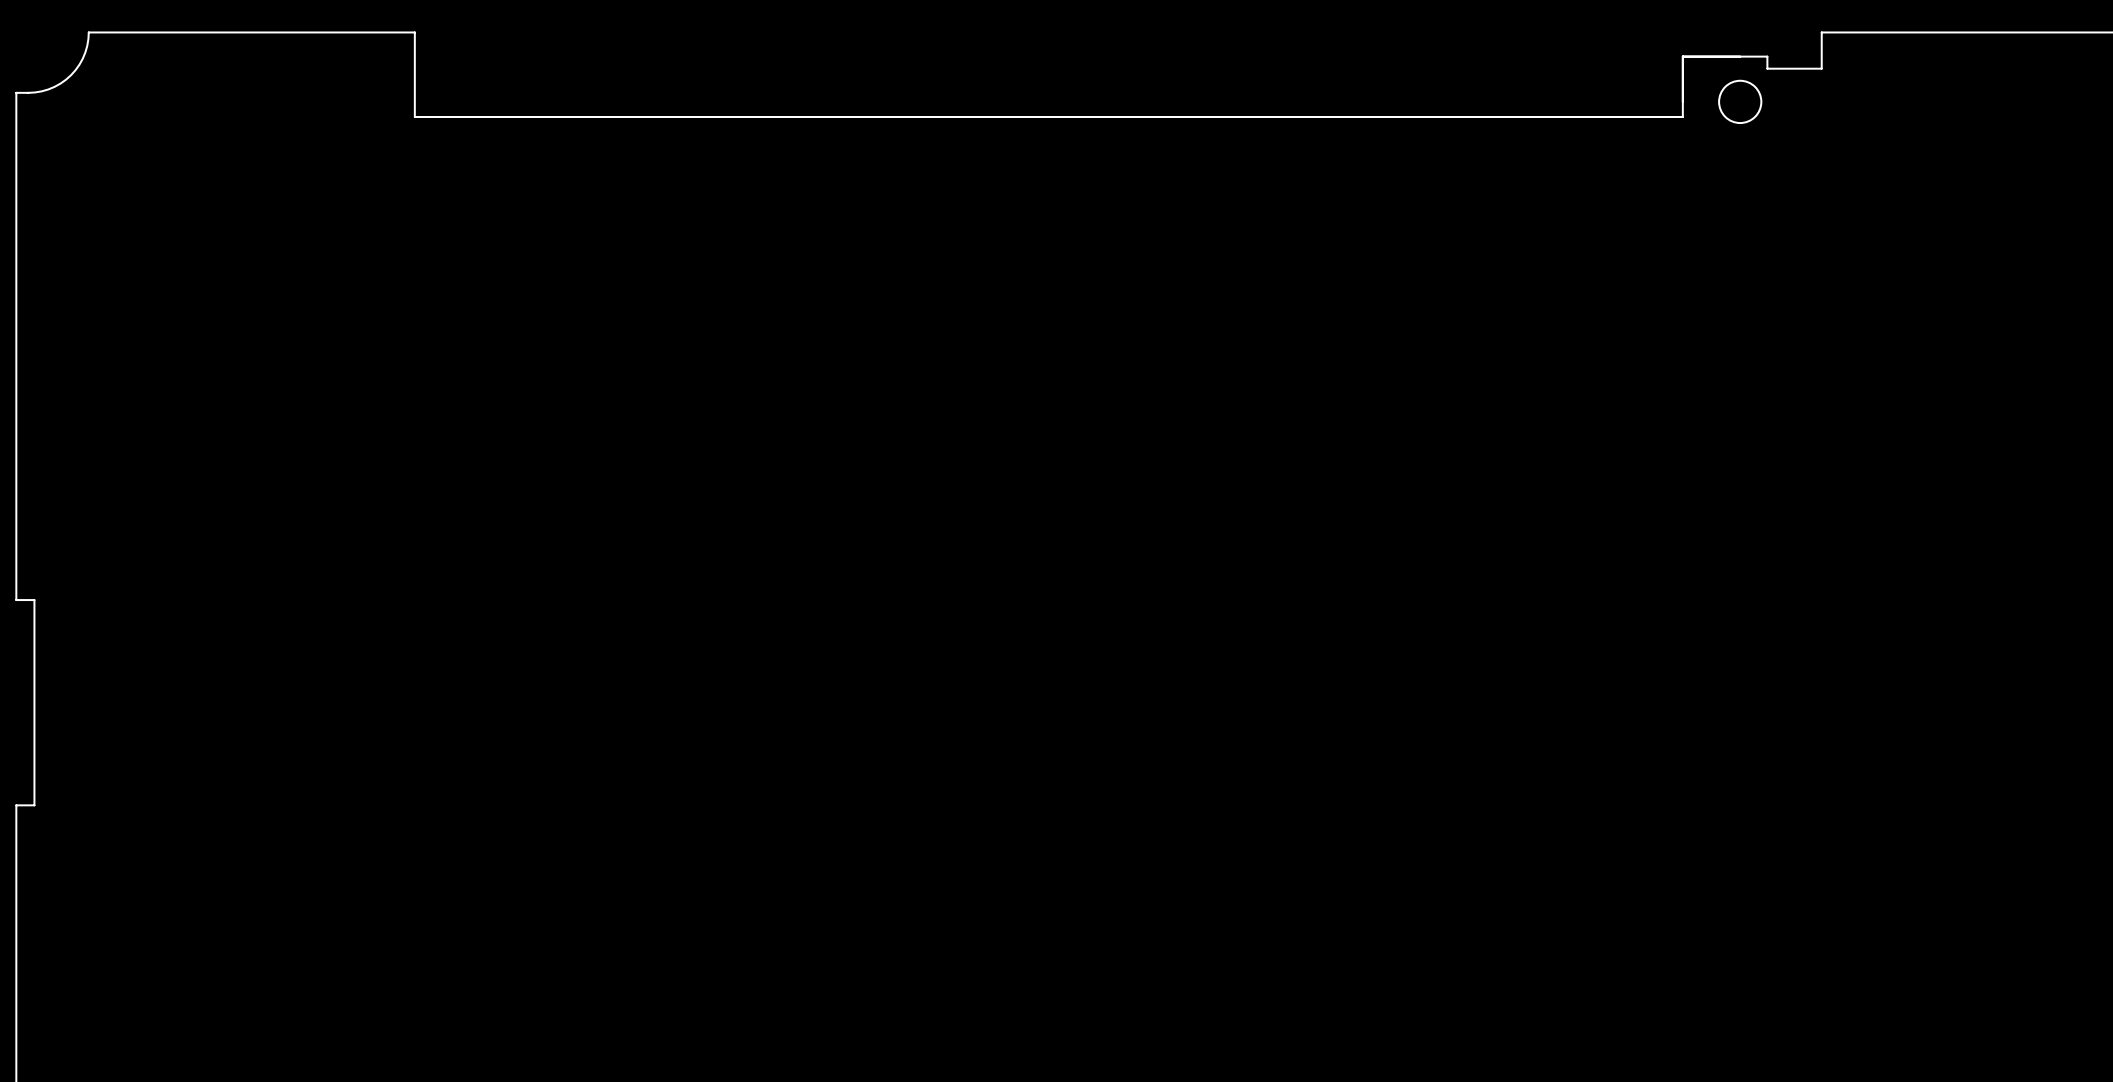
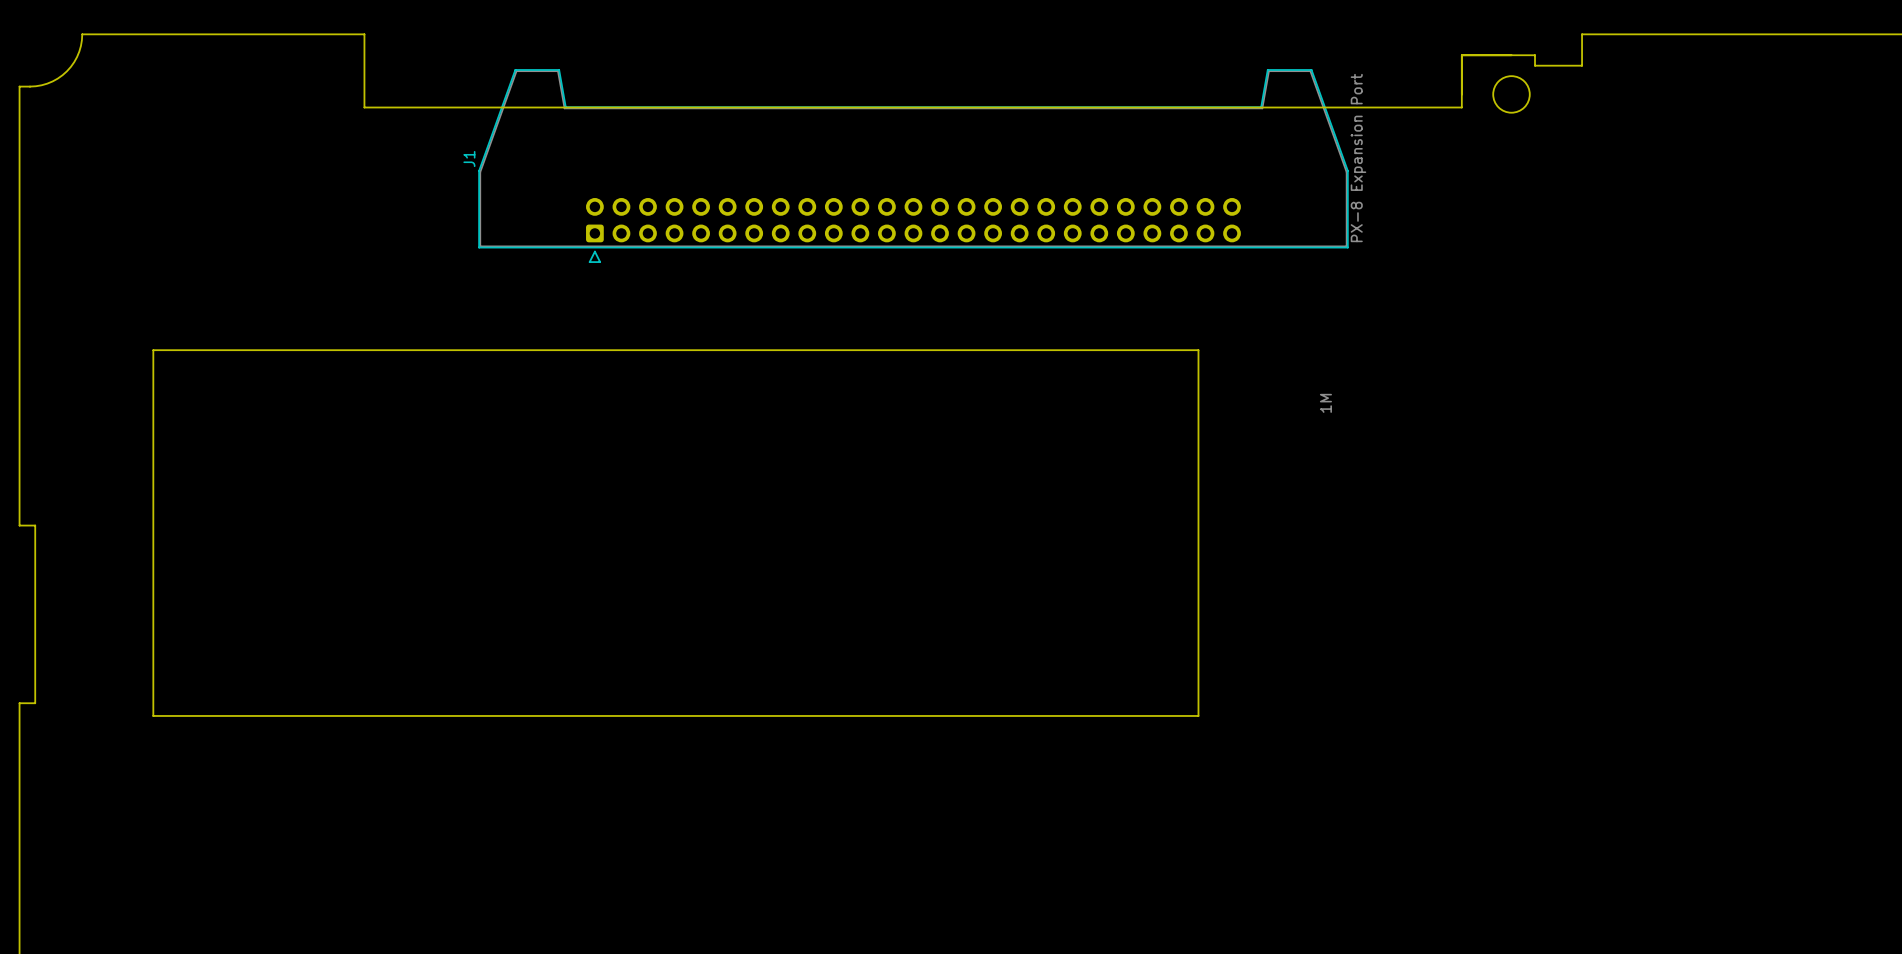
J1: none -> PX-8 Expansion Port (913, 166)
board edge: none -> (153, 350) (1198, 350) (1198, 715) (153, 715) (153, 350)
part: none -> 1M (1325, 403)

